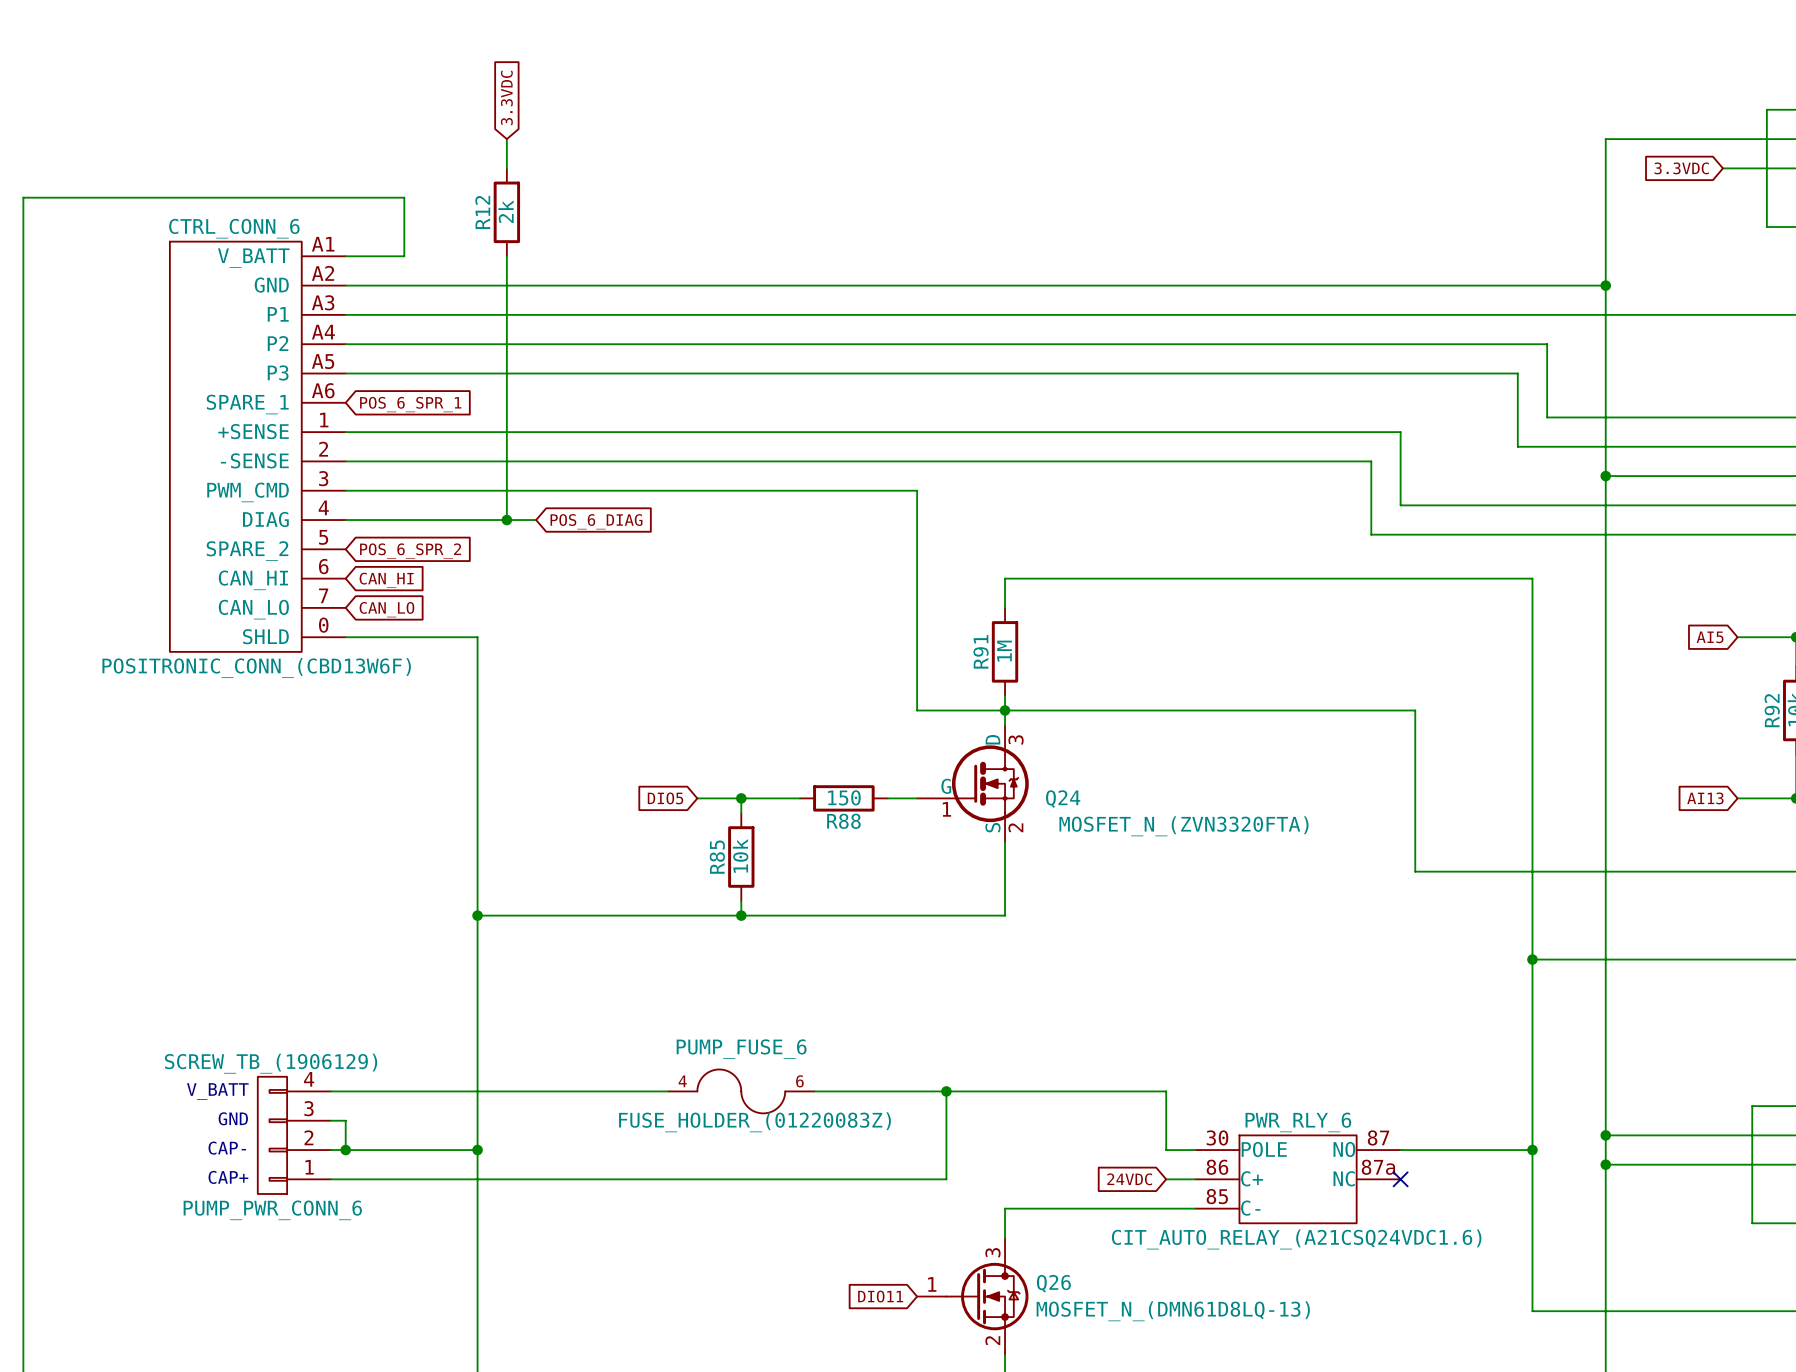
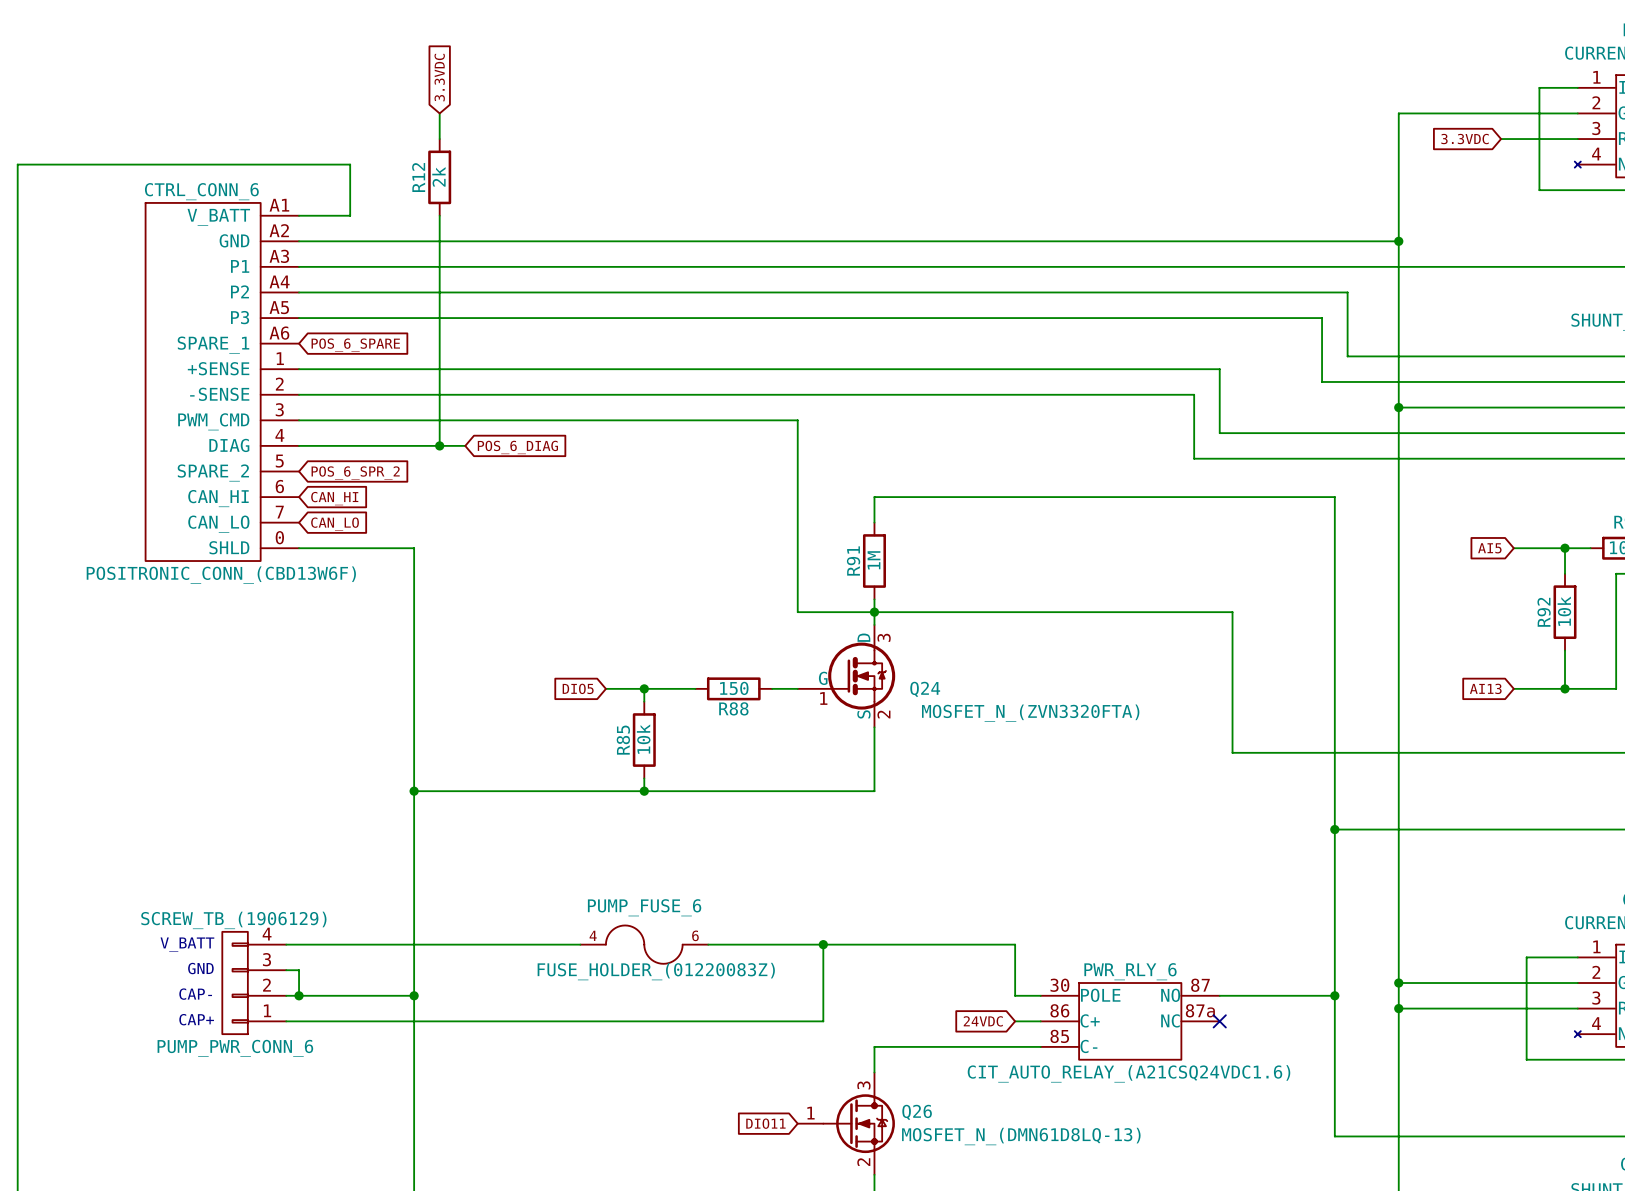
global label: POS_6_SPR_1 (410, 404) -> POS_6_SPARE (355, 345)

